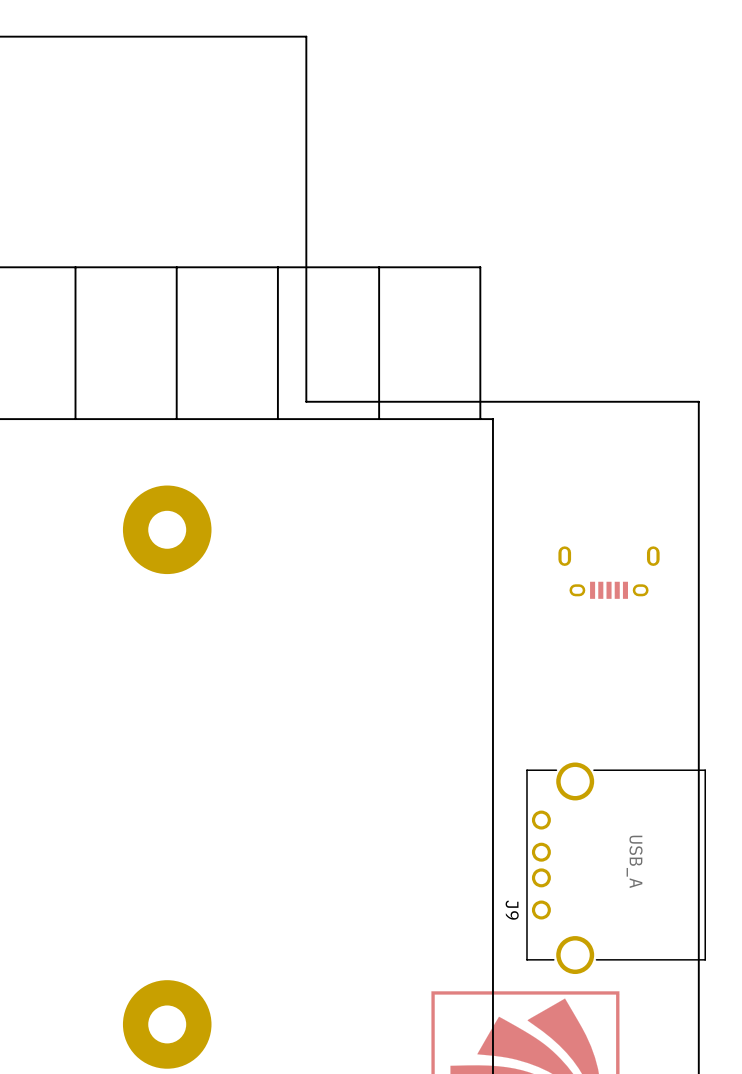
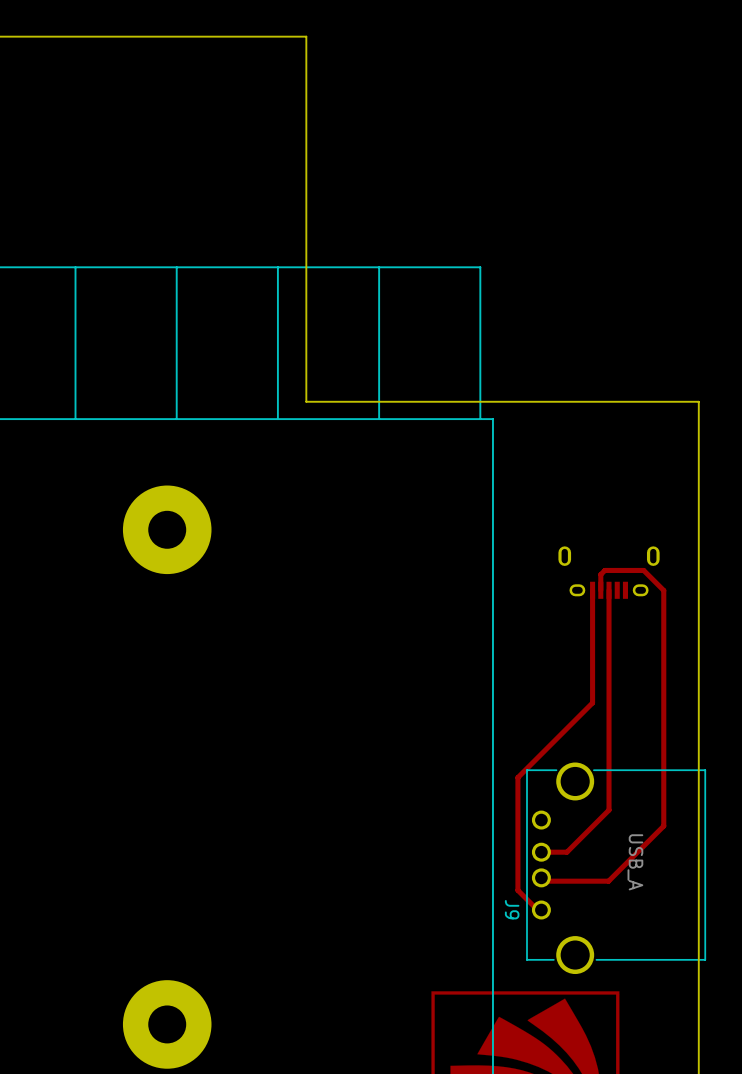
top track: none -> (592, 590) (592, 702) (517, 777) (517, 890) (537, 910) (541, 910)
top track: none -> (600, 590) (600, 574) (604, 570) (643, 570) (663, 590) (663, 826) (608, 881) (544, 881) (541, 877)
top track: none -> (609, 590) (609, 810) (566, 852) (541, 852)

